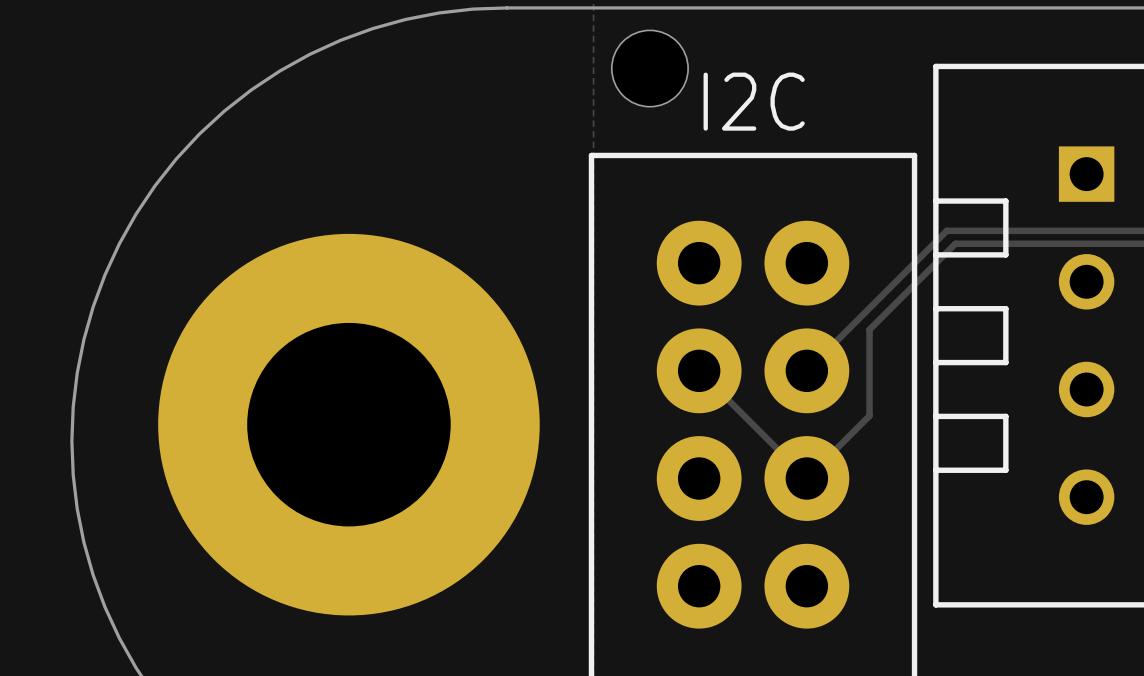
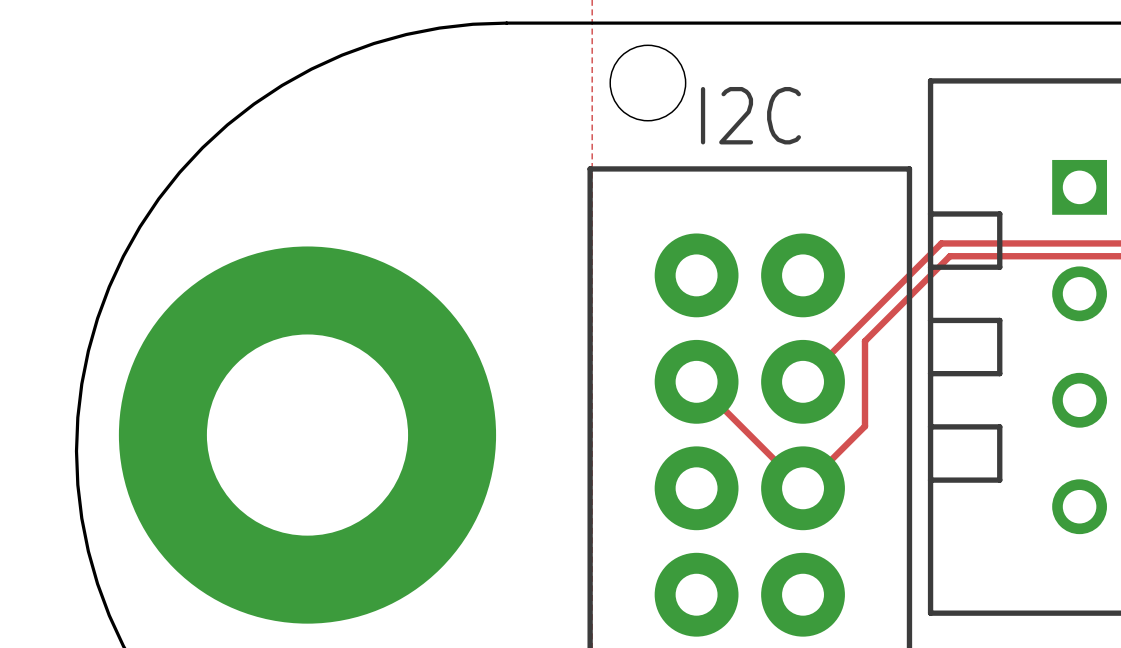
part position: (348, 424) -> (307, 435)

